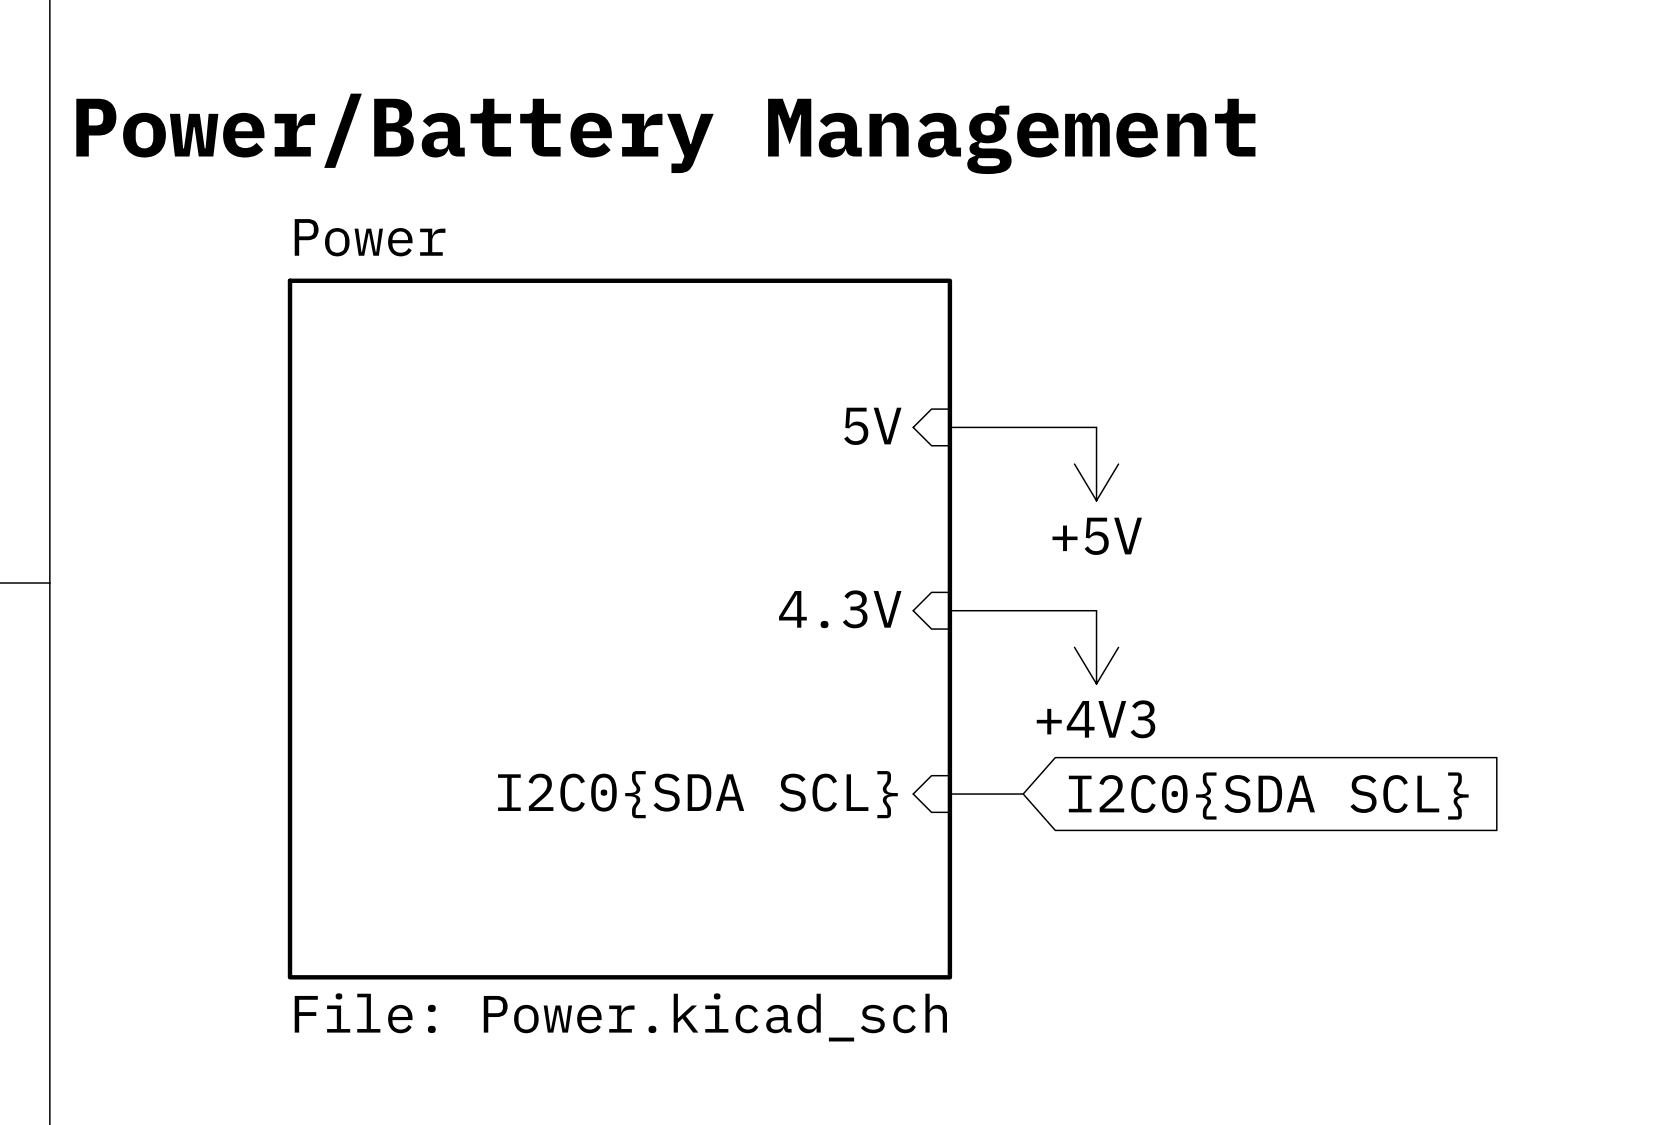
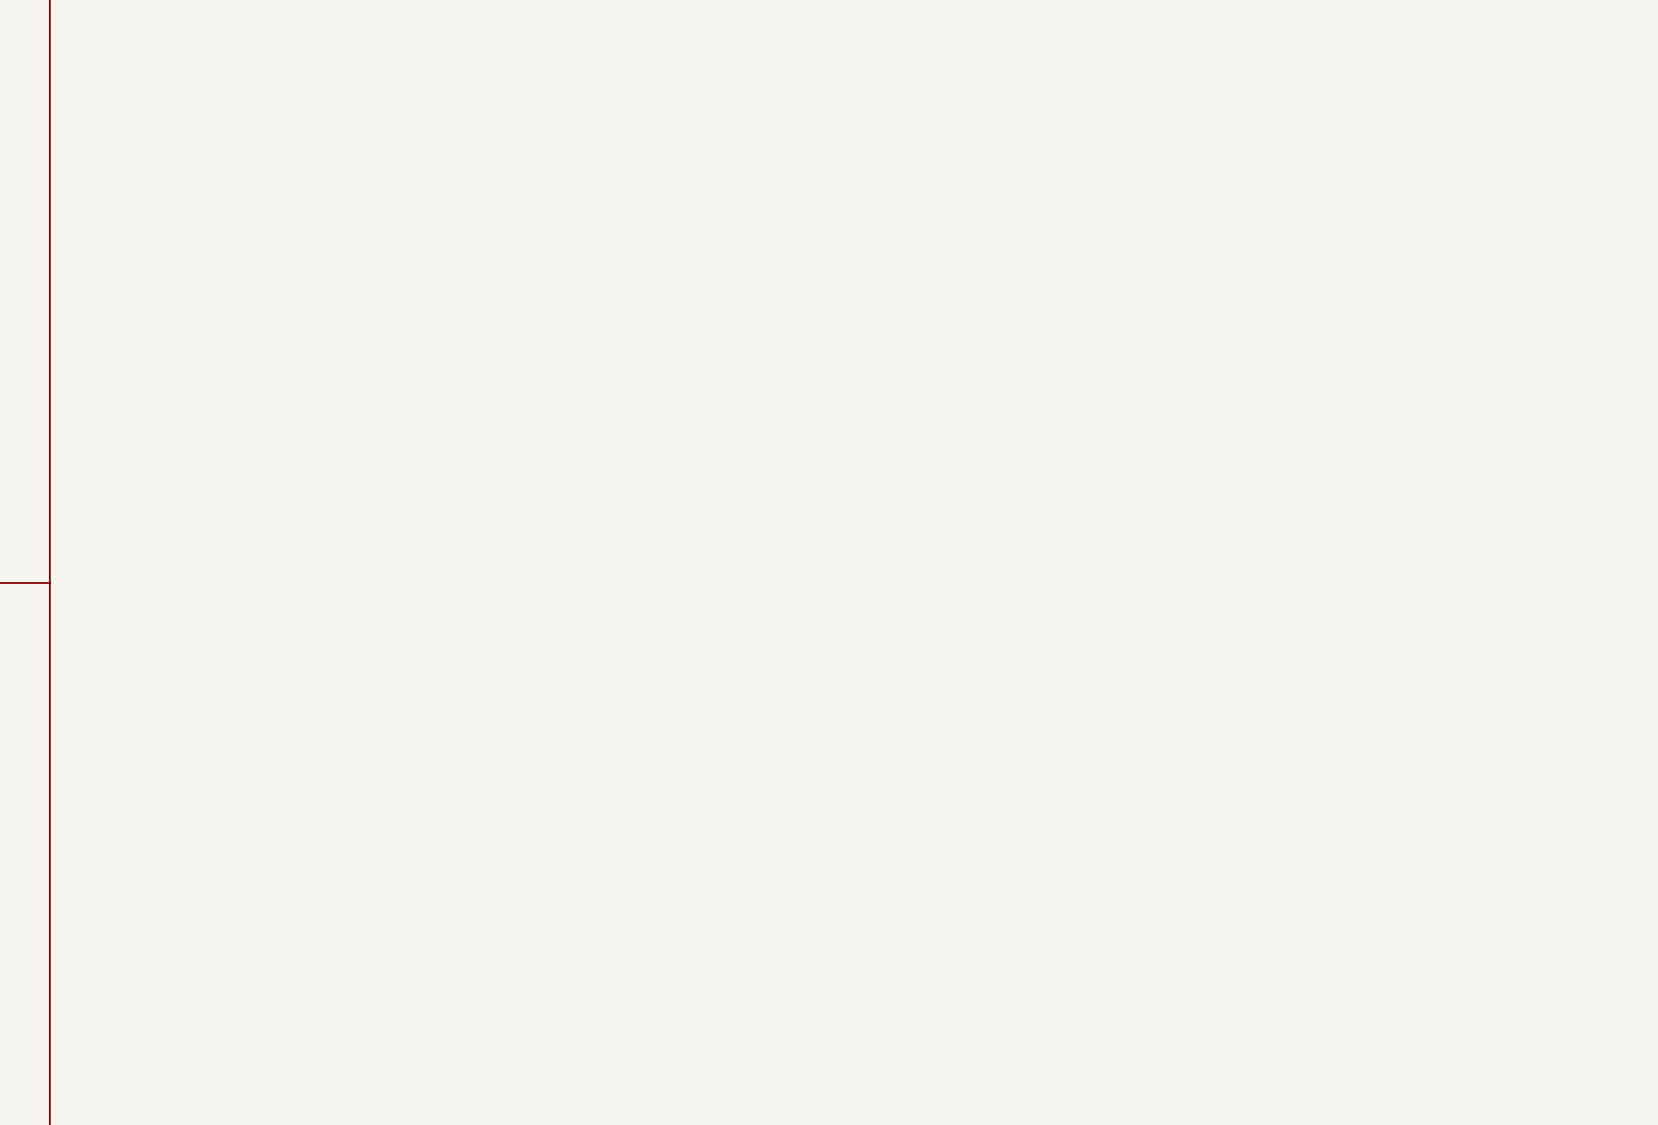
text: Power/Battery Management (665, 133) -> none
sheet pin: 5V (872, 426) -> none
wire: (949, 427) (1096, 427) -> none
power symbol: +5V (1096, 464) -> none
sheet pin: 4.3V (840, 609) -> none
wire: (949, 610) (1096, 610) -> none
sheet Power: File: Power.kicad_sch (619, 629) -> none
power symbol: +4V3 (1096, 647) -> none
sheet pin: I2C0{SDA SCL} (697, 794) -> none
bus: (949, 794) (1023, 794) -> none
global label: I2C0{SDA SCL} (1268, 796) -> none

